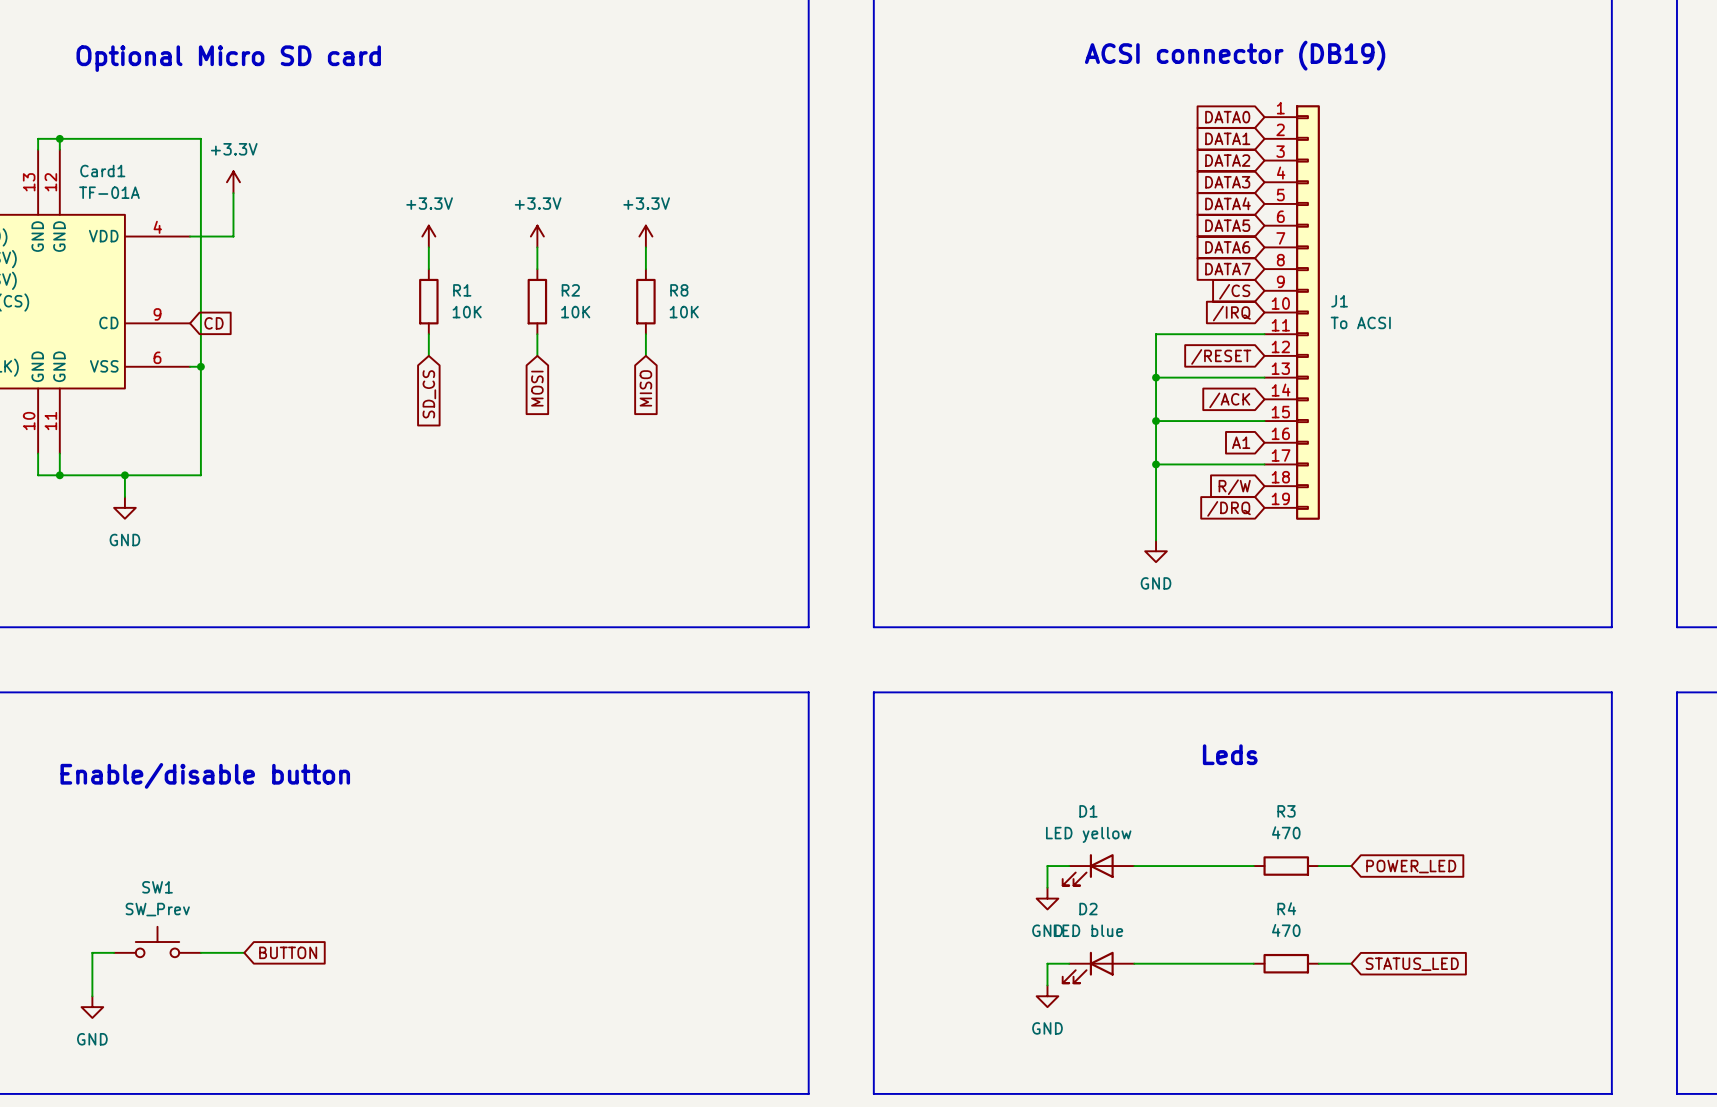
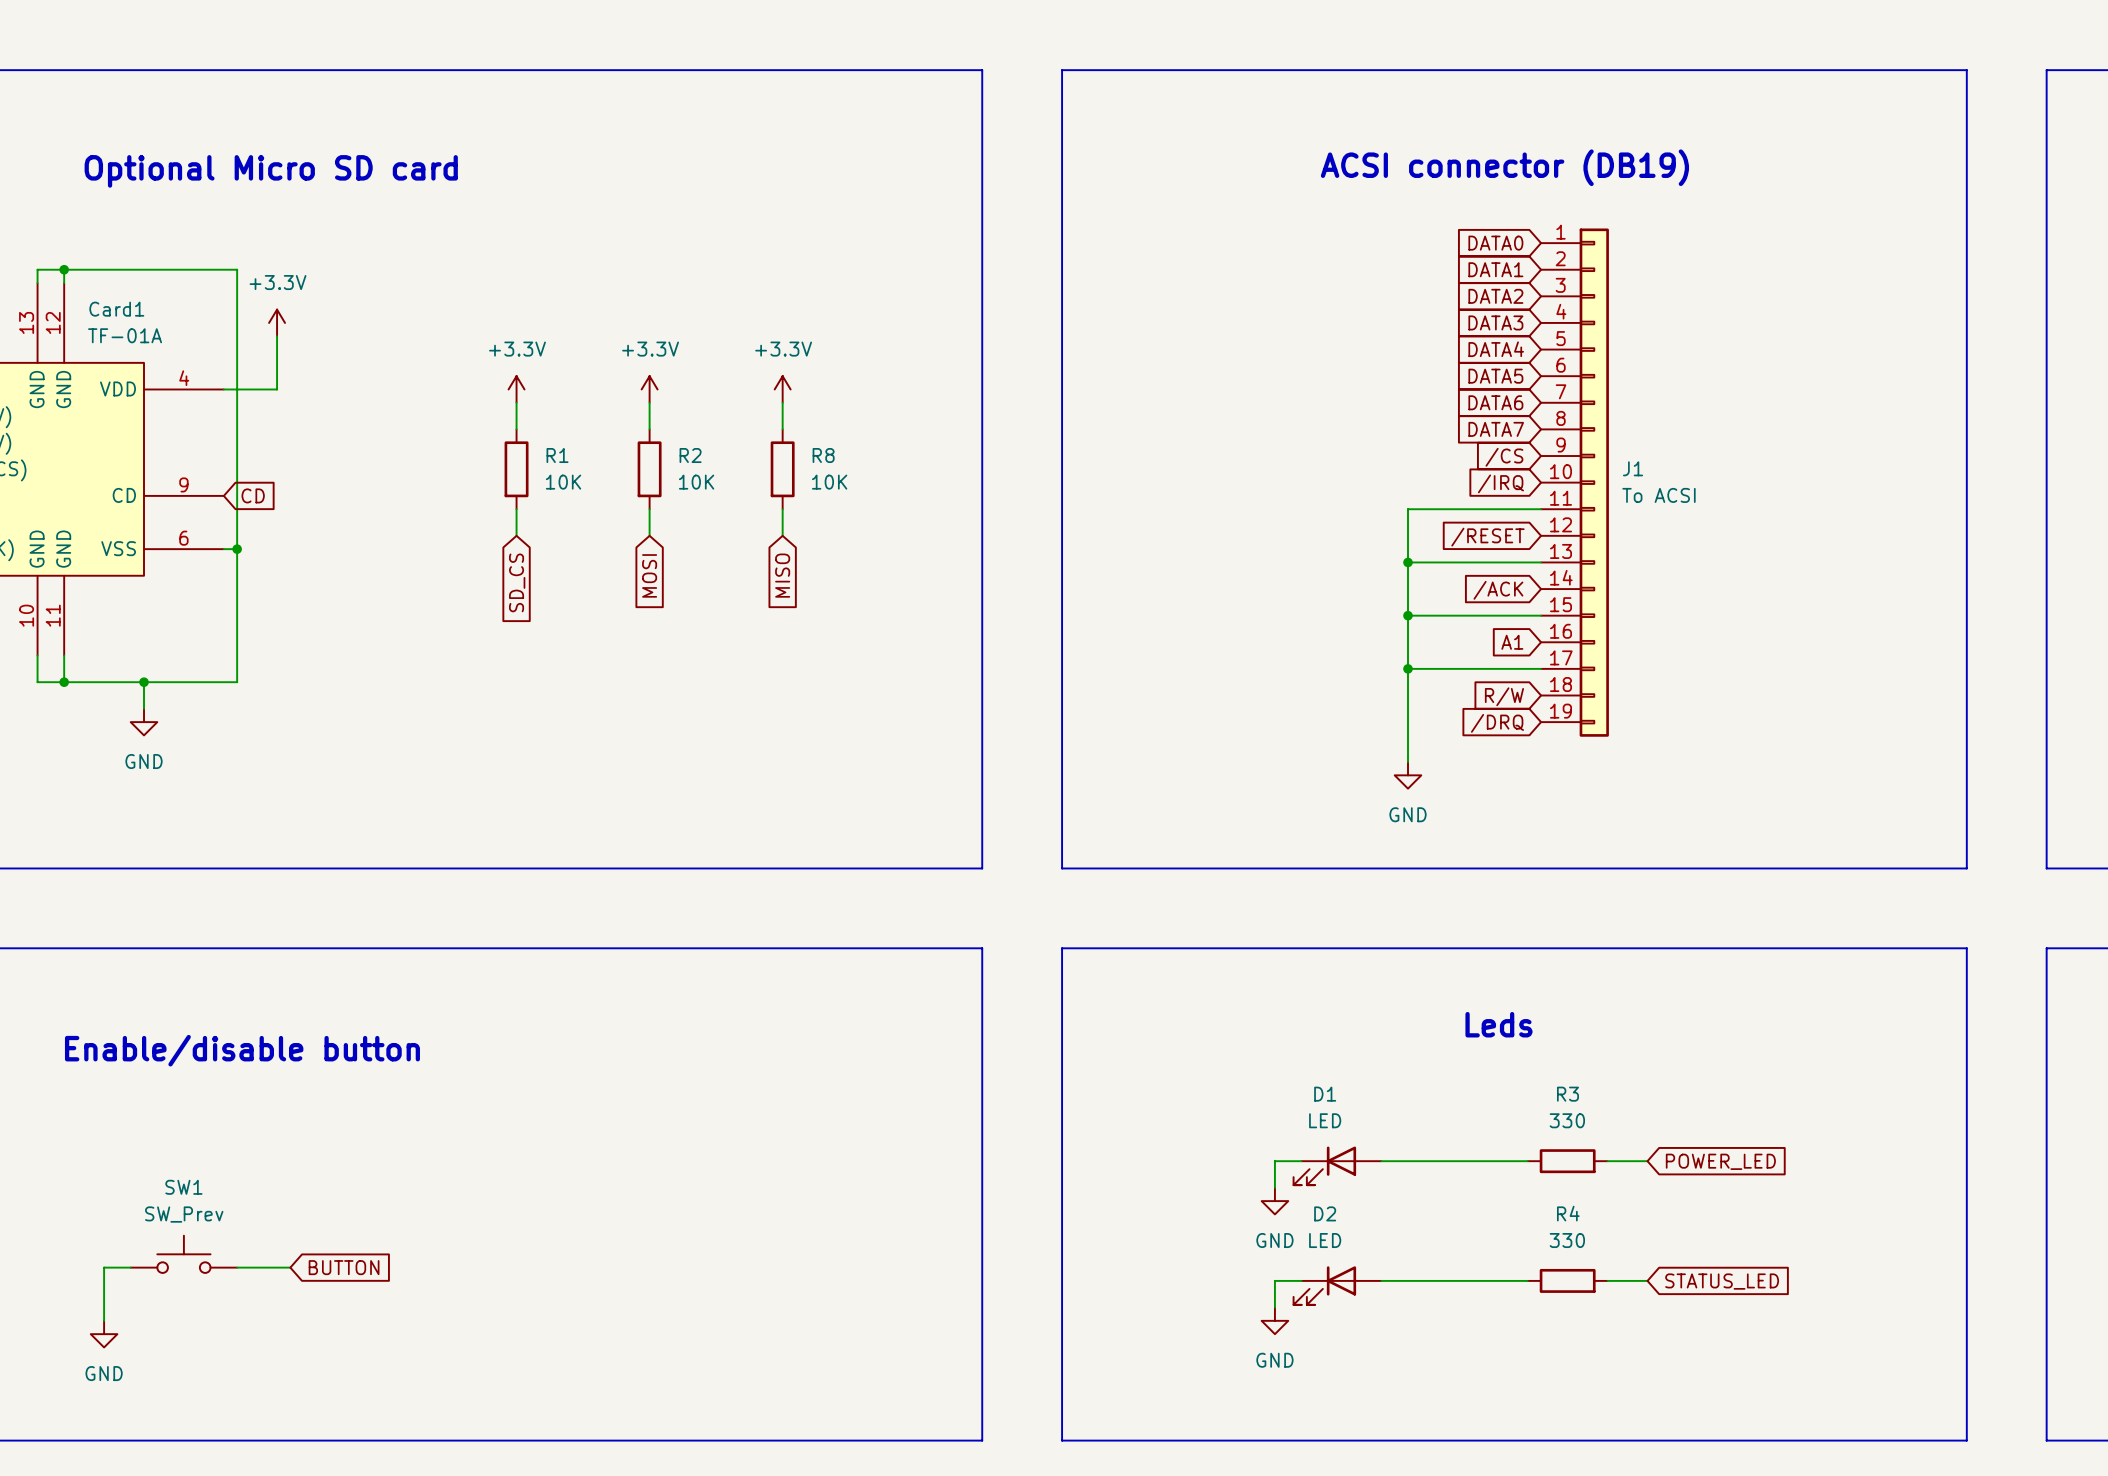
R3 value: 470 (1286, 832) -> 330 (1567, 1120)
D1 value: LED yellow (1088, 834) -> LED (1325, 1120)
D2 value: LED blue (1088, 930) -> LED (1325, 1240)
R4 value: 470 (1286, 930) -> 330 (1567, 1240)

